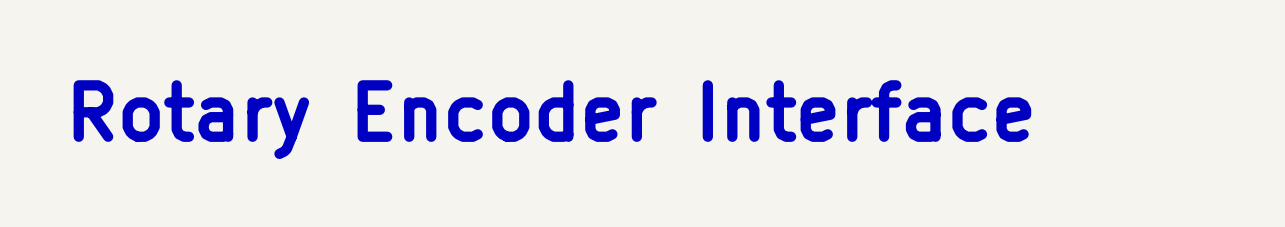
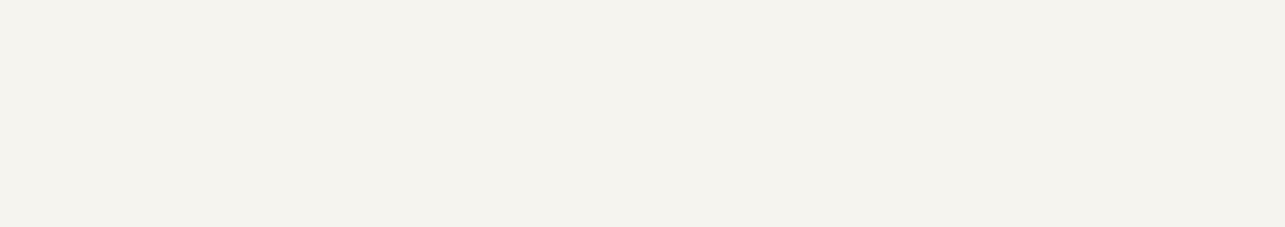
text: Rotary Encoder Interface (552, 119) -> none

